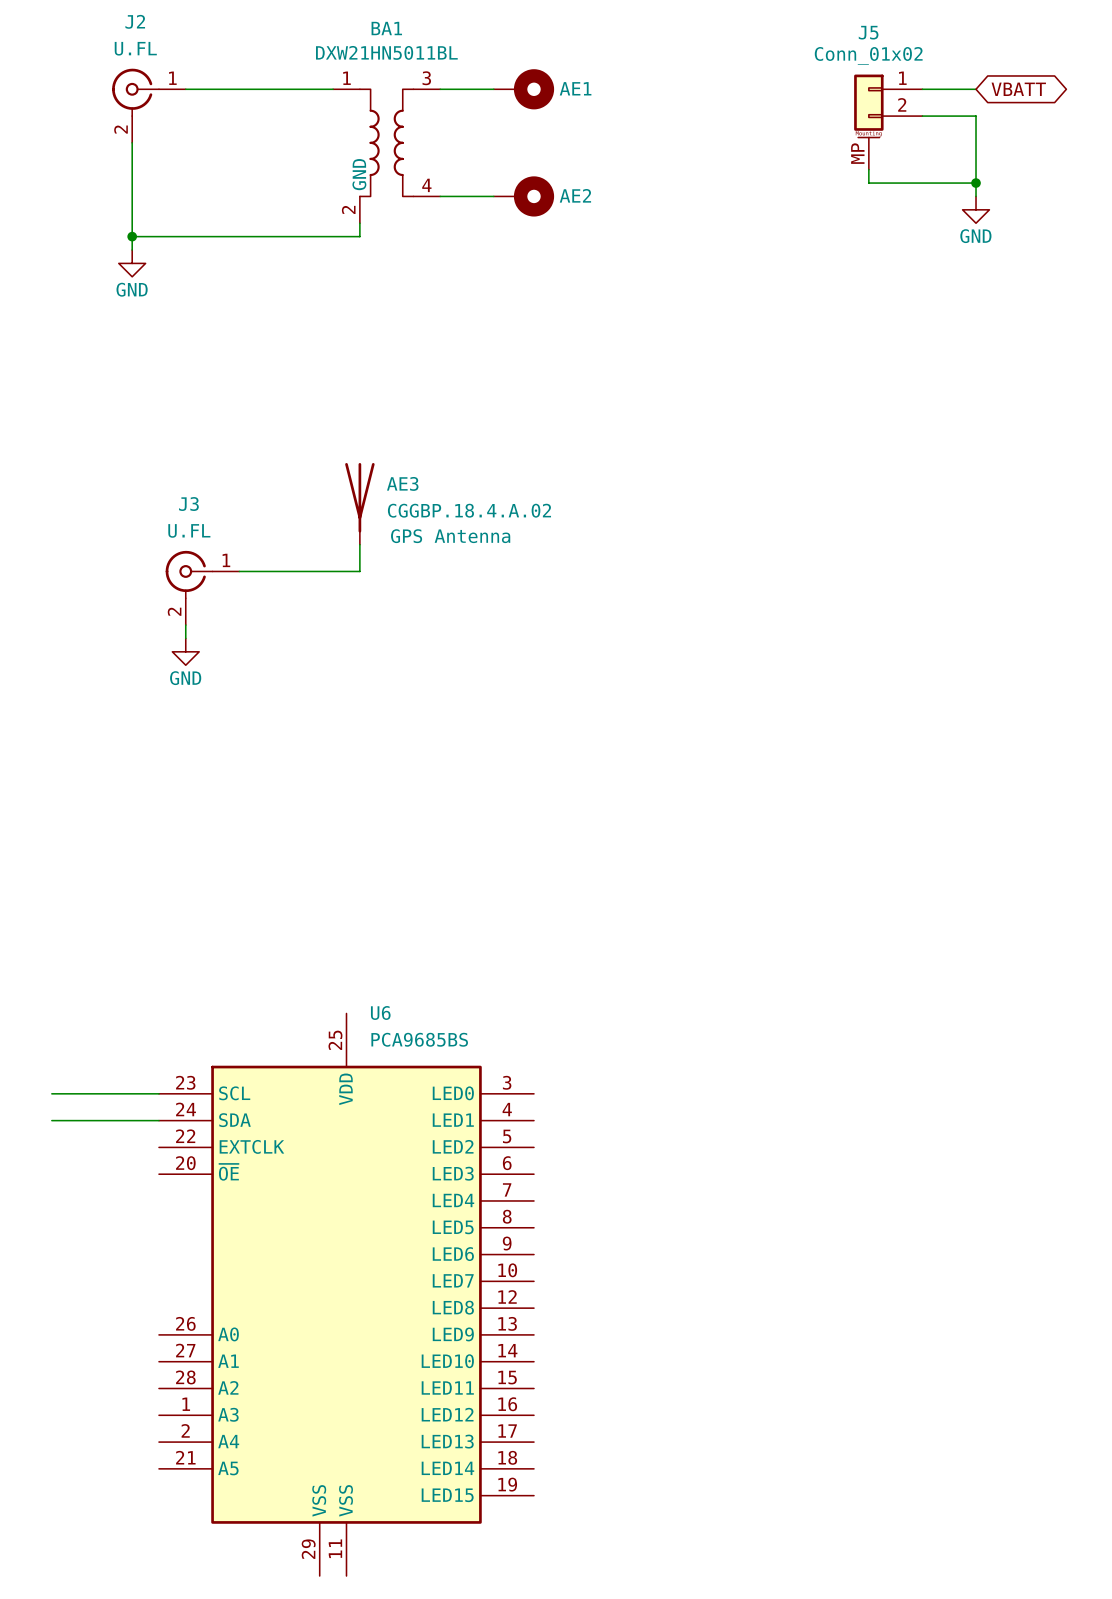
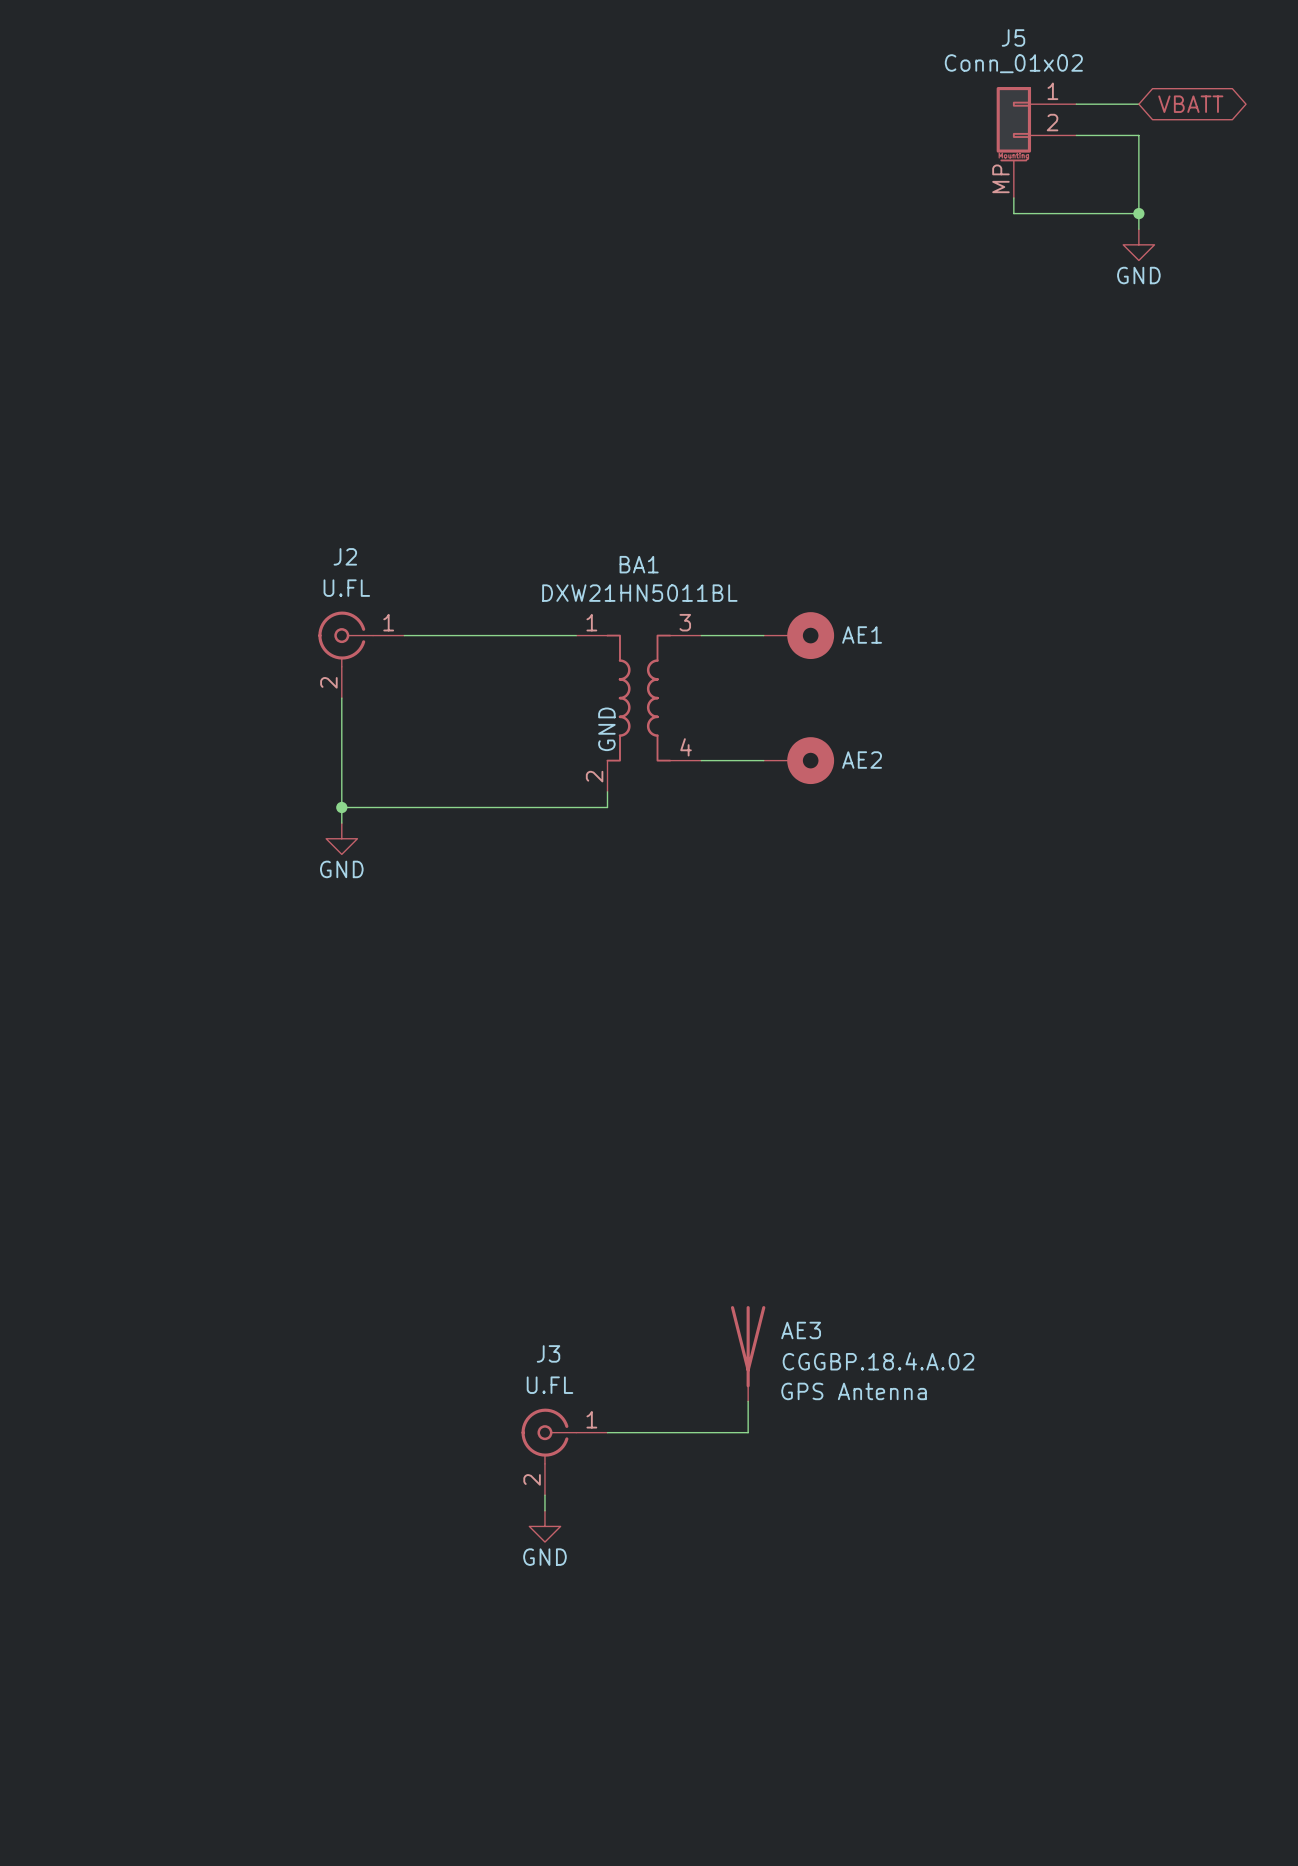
wire: (185, 89) (333, 89) -> none
wire: (440, 89) (493, 89) -> none
AE1 position: (523, 89) -> (798, 635)
J2 position: (148, 105) -> (361, 654)
wire: (132, 142) (132, 250) -> none
BA1 position: (386, 155) -> (638, 713)
wire: (440, 196) (493, 196) -> none
AE2 position: (523, 196) -> (798, 760)
wire: (359, 223) (359, 236) (132, 236) -> none
junction: (132, 236) -> none
power symbol: GND (132, 263) -> none
AE3 position: (359, 503) -> (748, 1353)
wire: none -> (404, 635) (576, 635)
wire: (359, 544) (359, 571) (239, 571) -> none
wire: none -> (701, 635) (763, 635)
J3 position: (202, 587) -> (564, 1451)
wire: none -> (341, 698) (341, 823)
wire: (185, 625) (185, 638) -> none
power symbol position: GND (185, 651) -> GND (341, 838)
wire: none -> (701, 760) (763, 760)
wire: none -> (607, 791) (607, 807) (341, 807)
junction: none -> (341, 807)
wire: (51, 1093) (158, 1093) -> none
wire: (51, 1120) (158, 1120) -> none
wire: none -> (748, 1401) (748, 1432) (607, 1432)
U6: PCA9685BS (346, 1294) -> none
power symbol: none -> GND (544, 1526)

